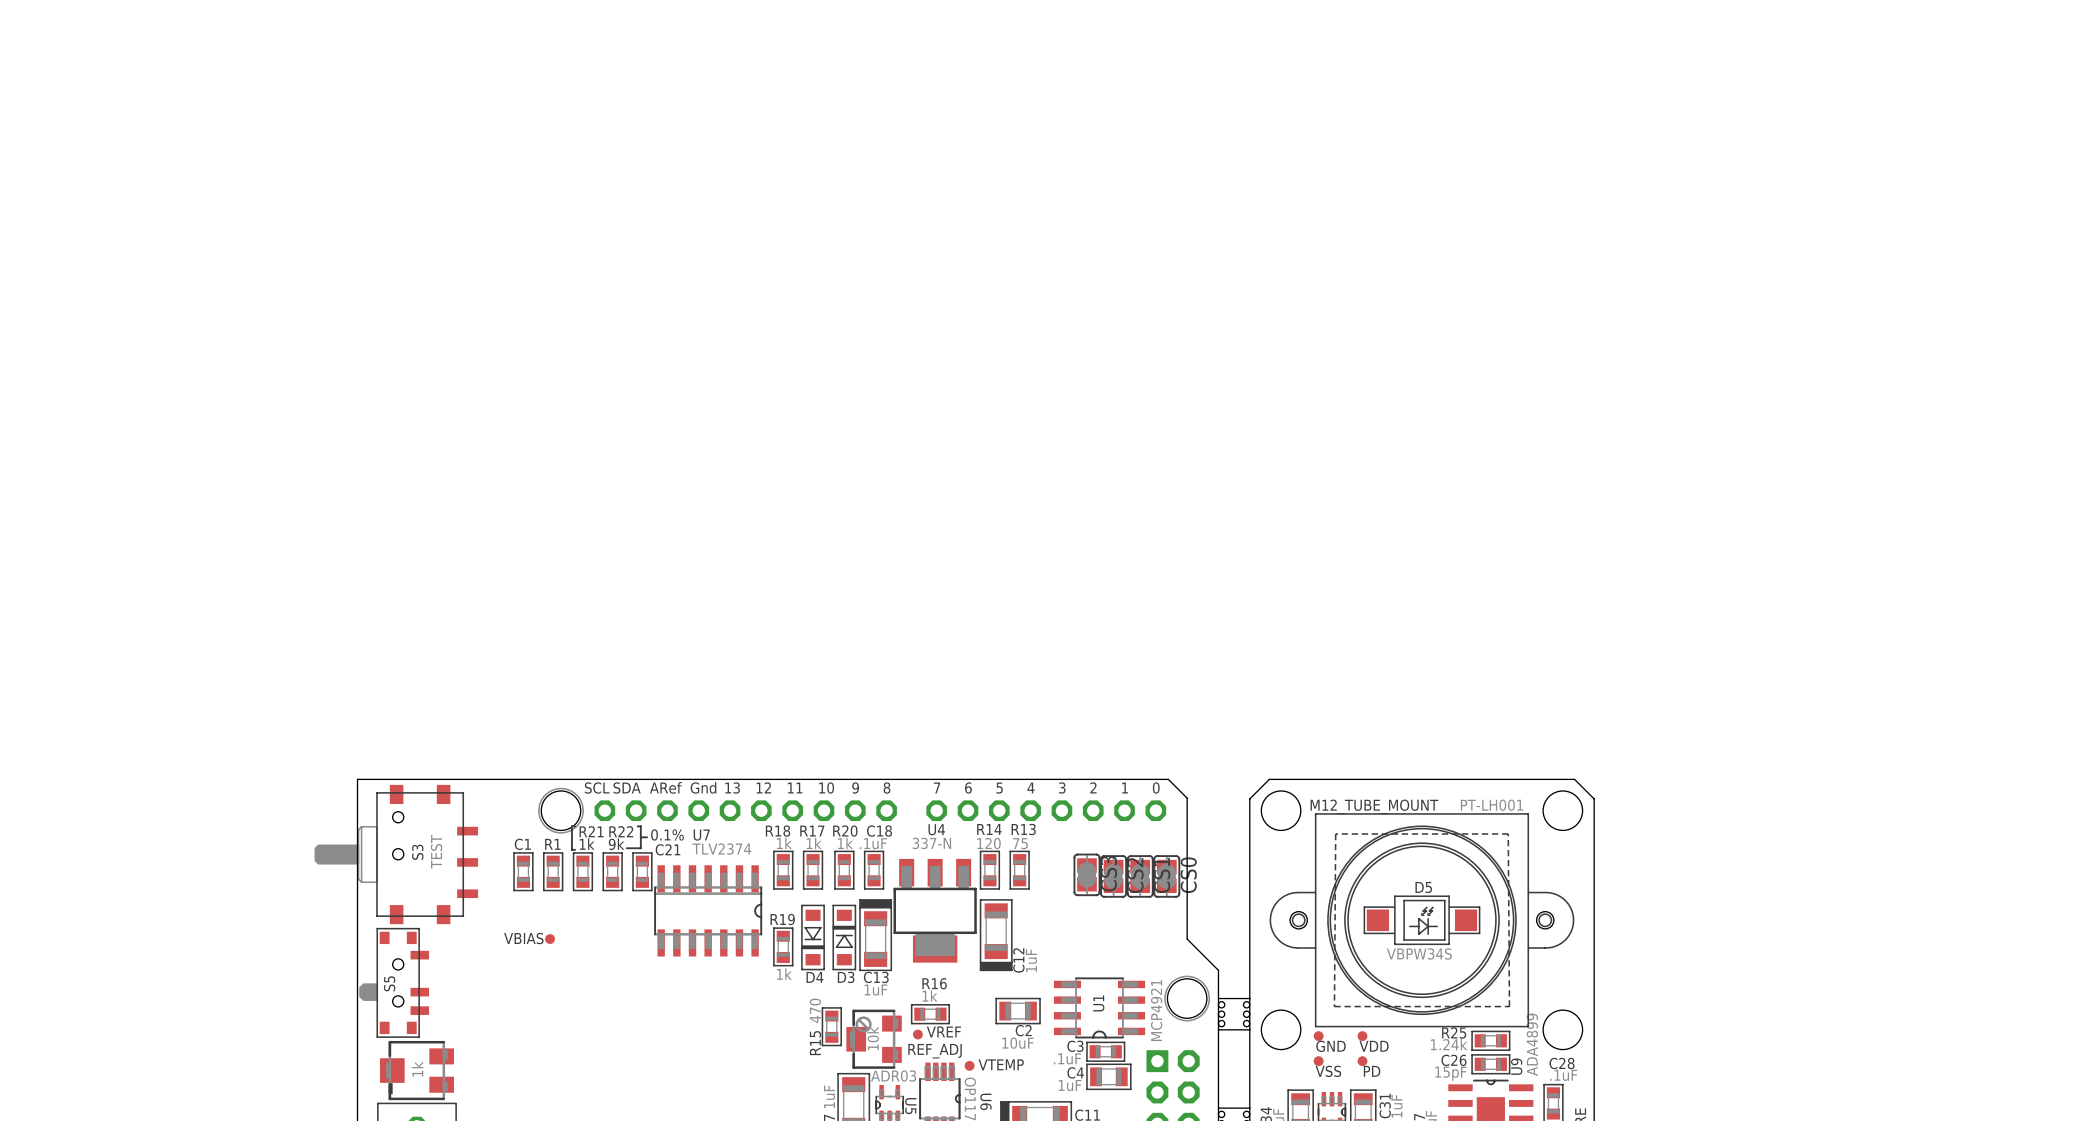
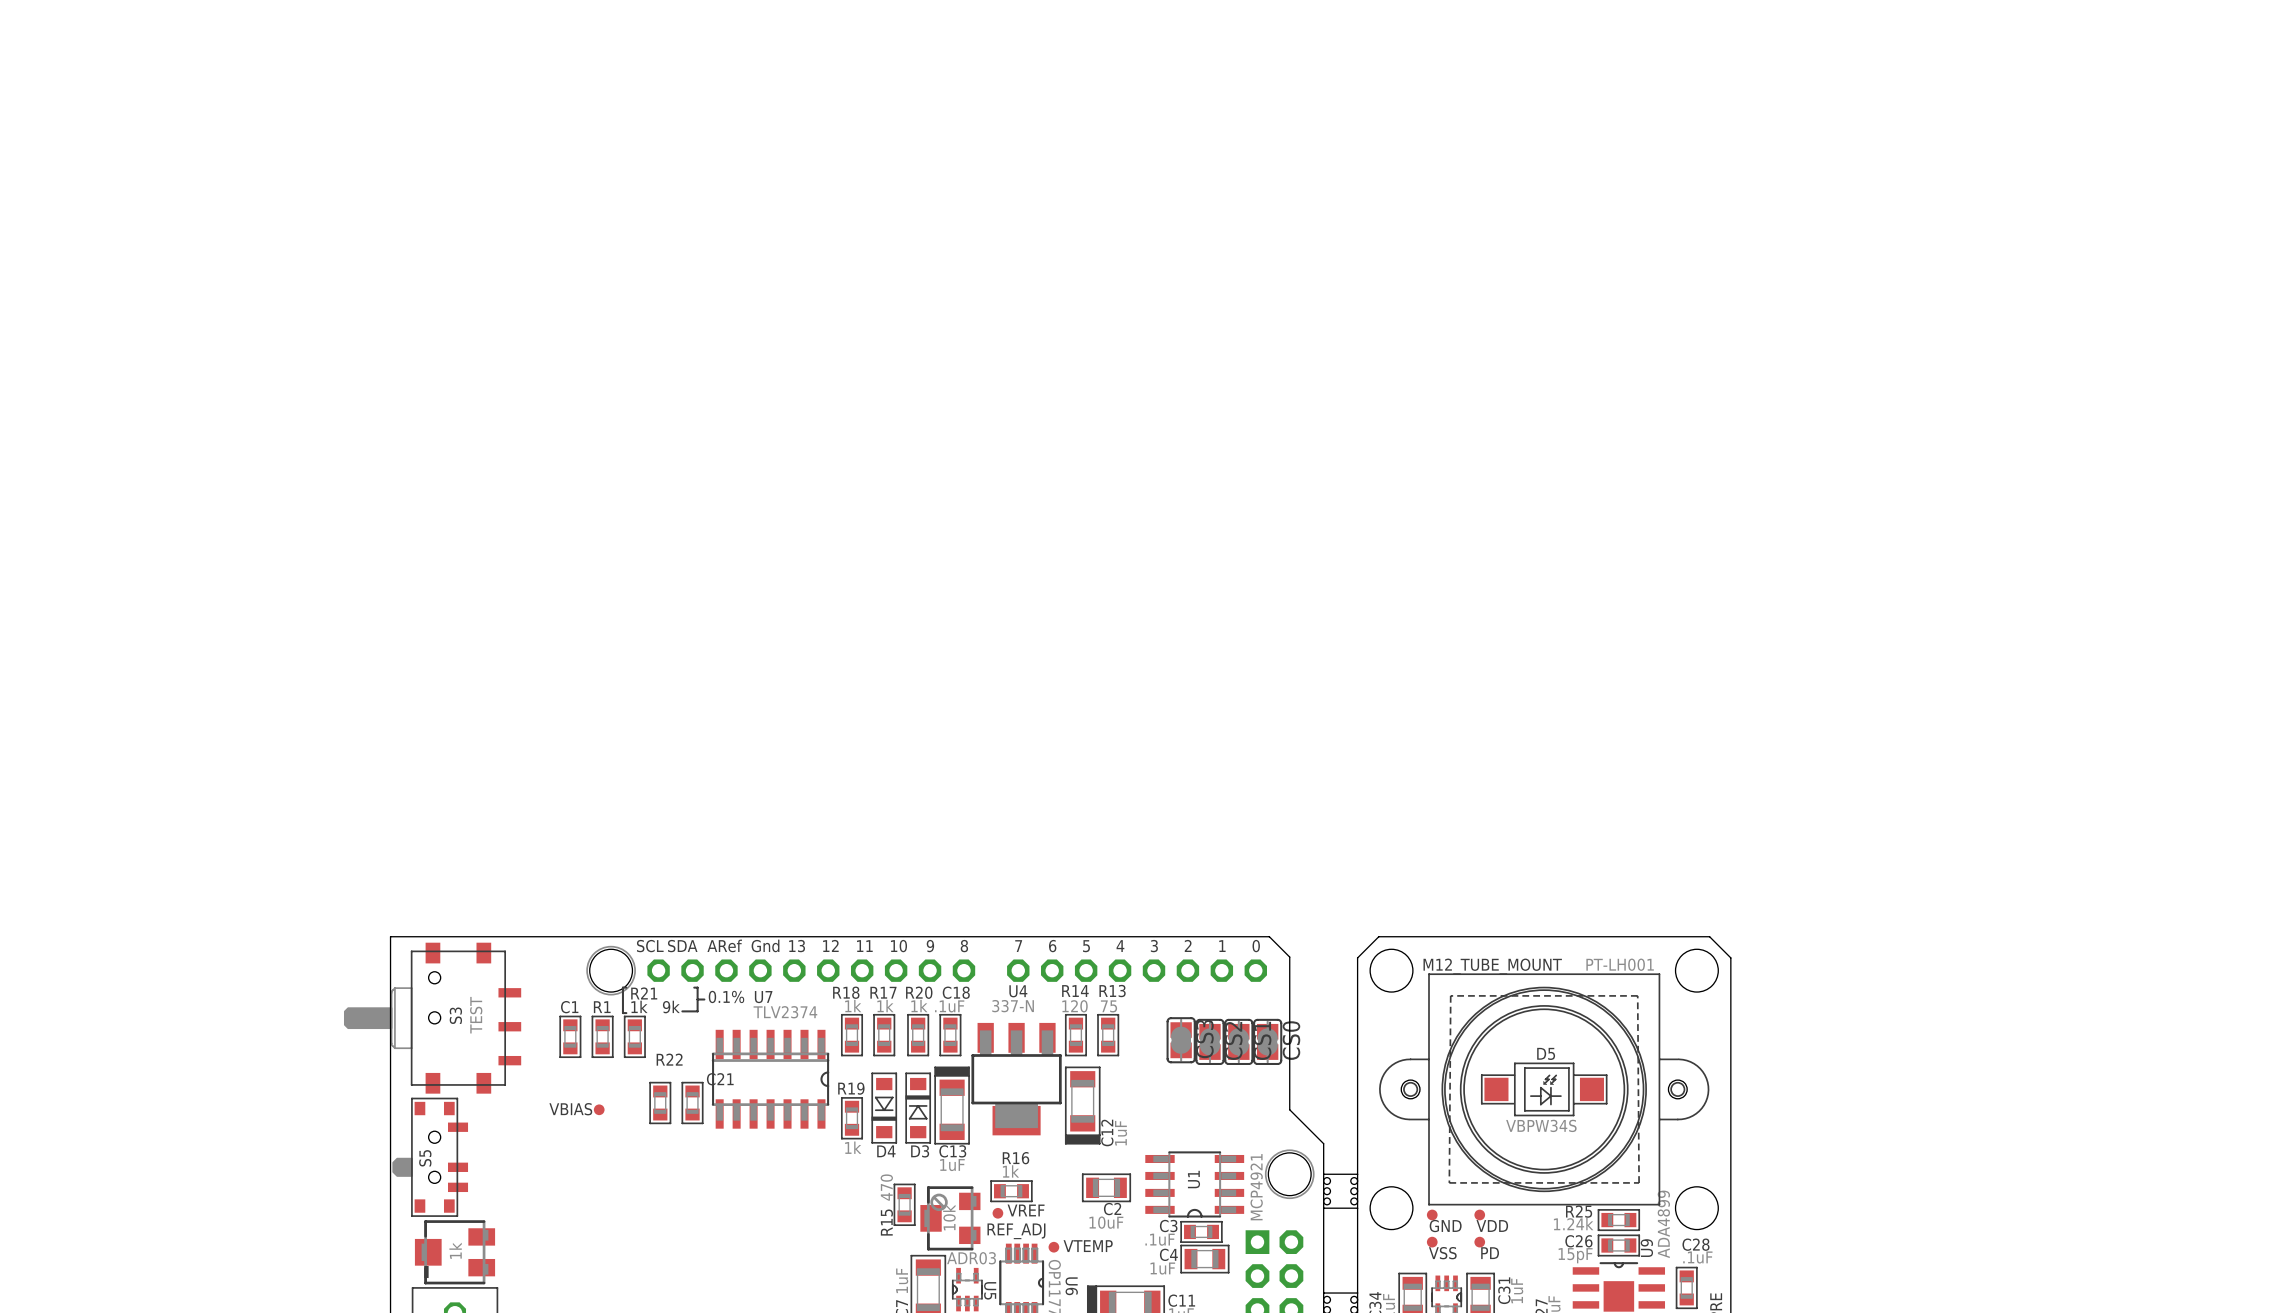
R22 position: (612, 871) -> (660, 1103)
C21 position: (642, 871) -> (692, 1103)

